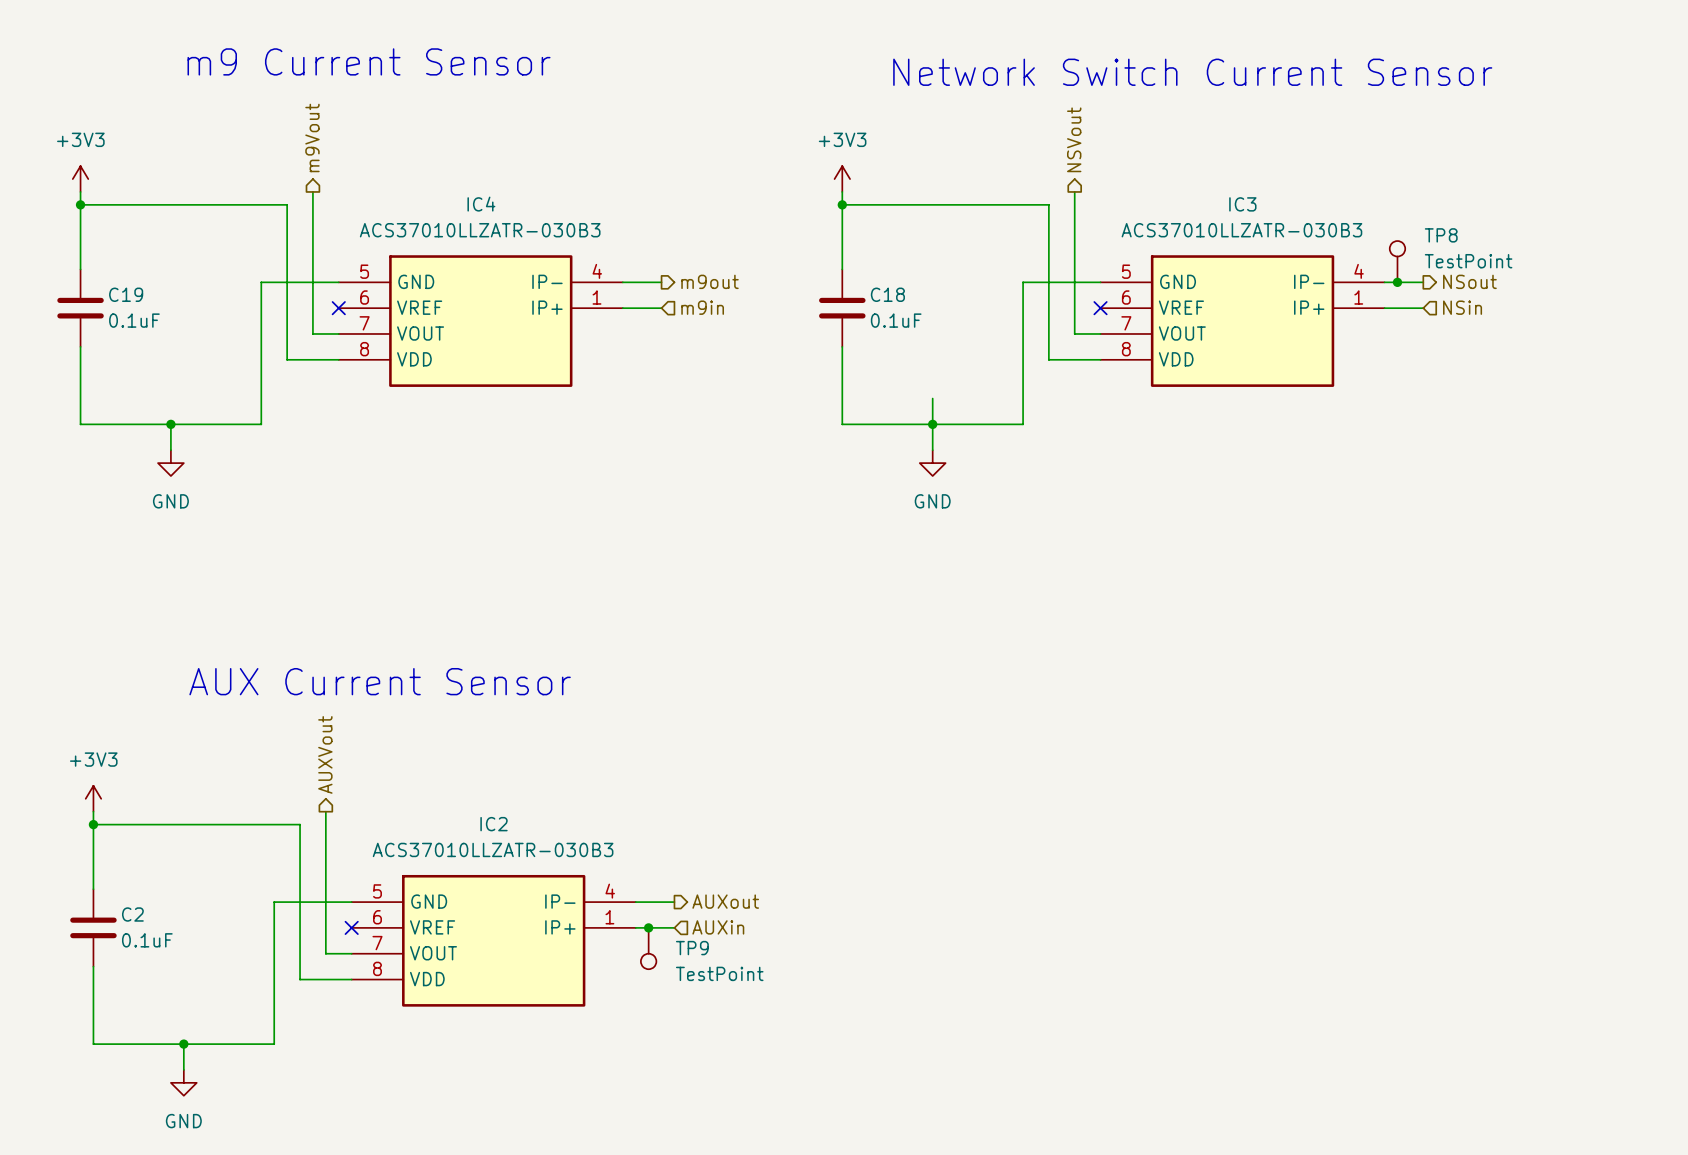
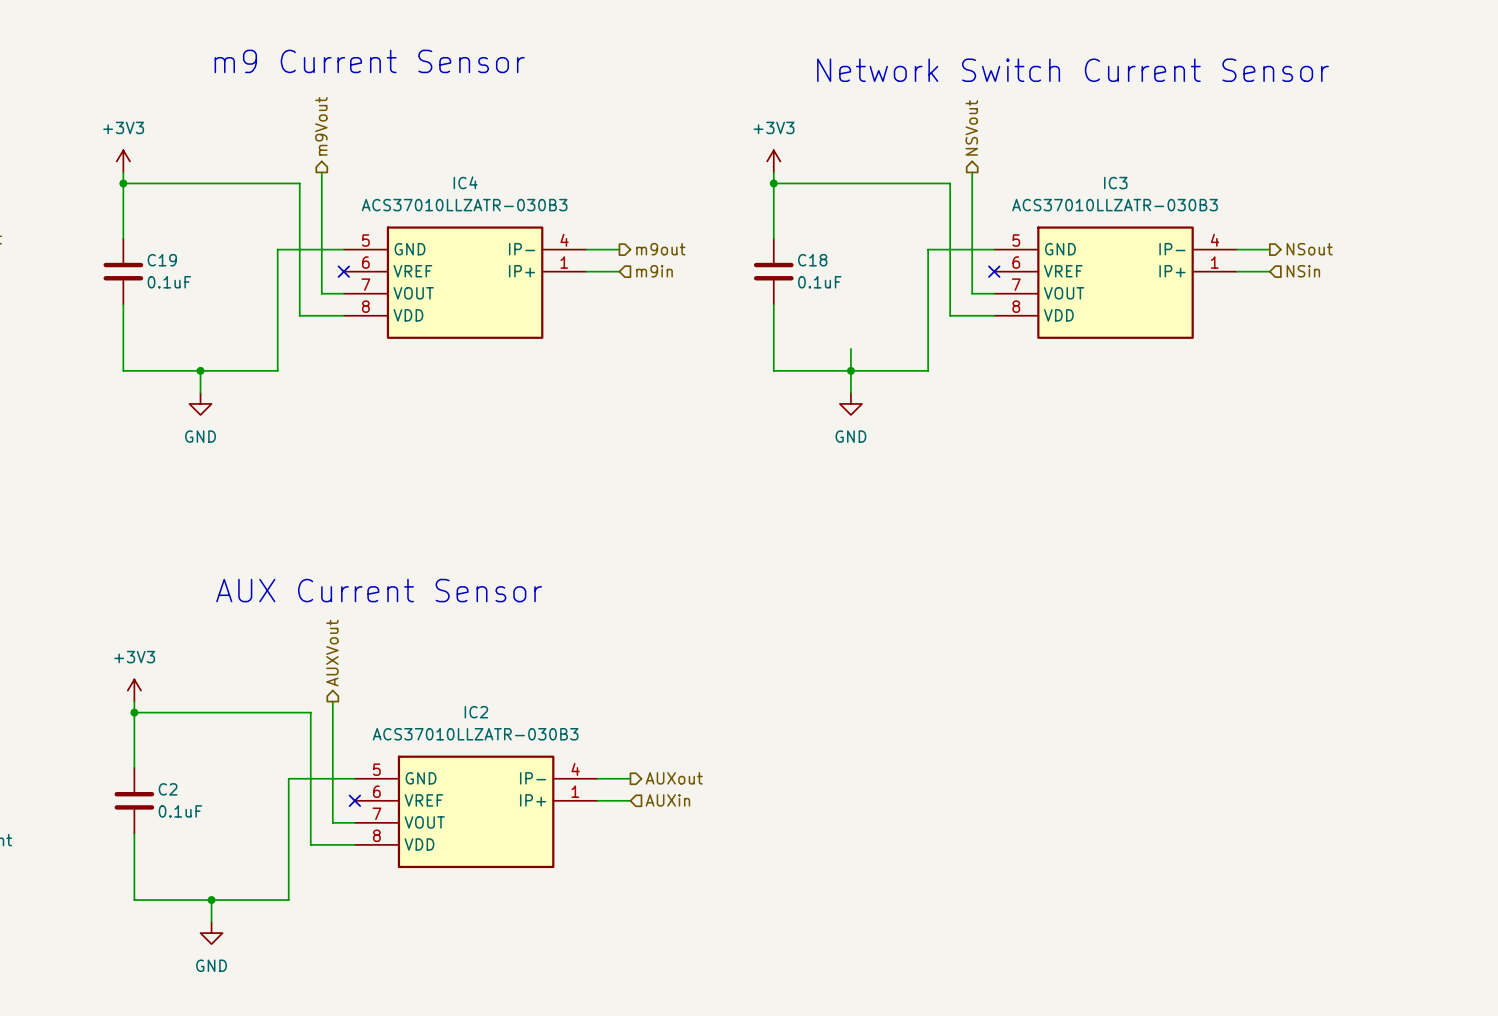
TP8: TestPoint (1397, 261) -> none
junction: (1397, 282) -> none
junction: (648, 927) -> none
TP9: TestPoint (648, 948) -> none

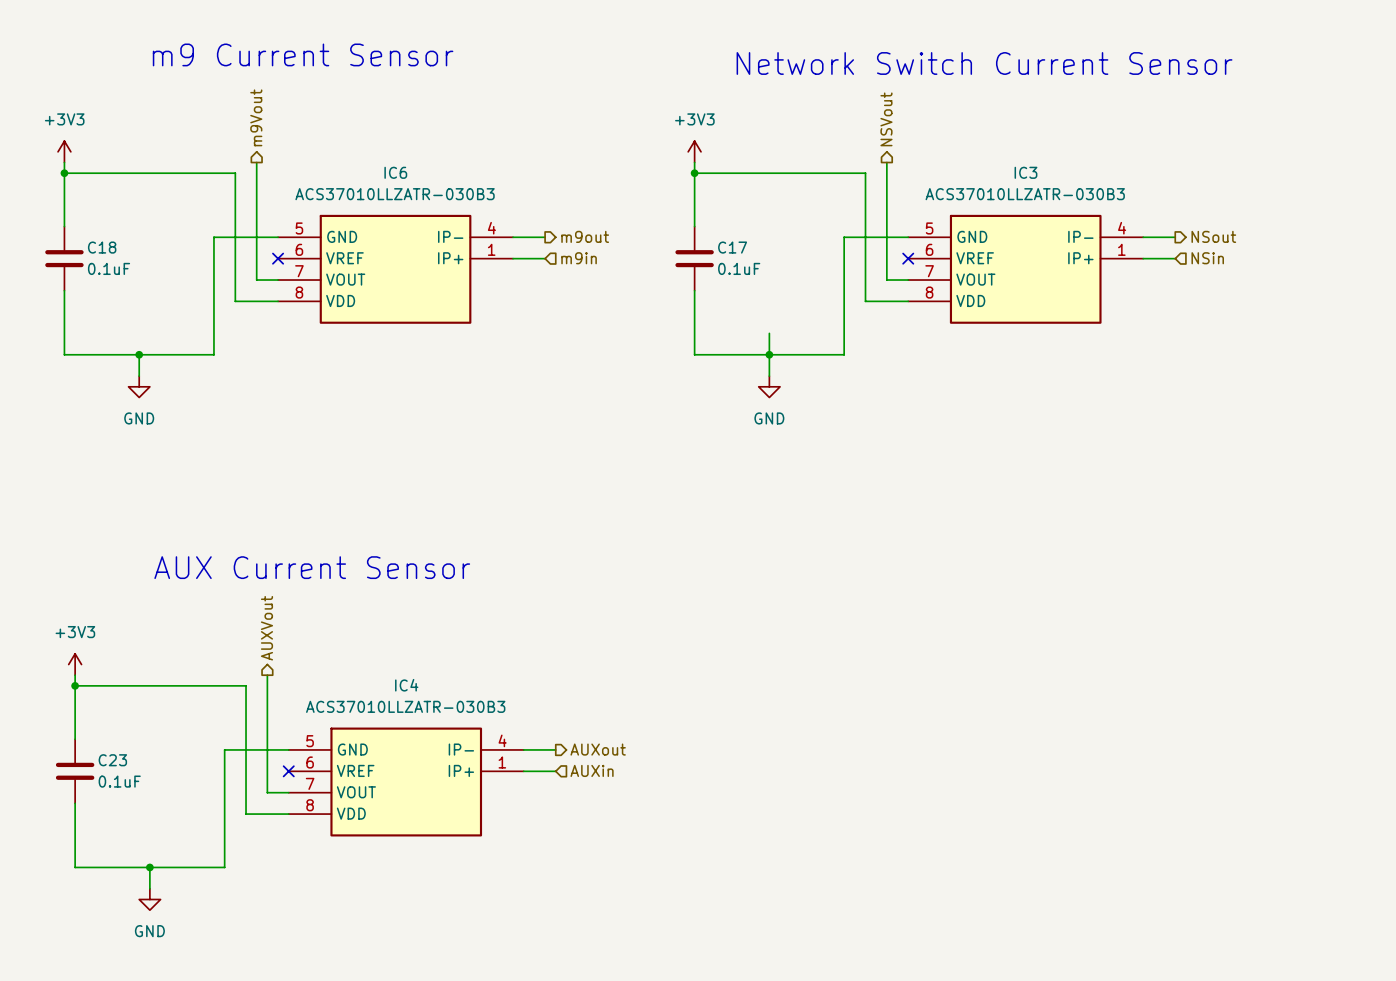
IC4 name: IC4 (465, 182) -> IC6 (395, 172)
C19 name: C19 (162, 260) -> C18 (102, 247)
C18 name: C18 (812, 260) -> C17 (732, 247)
IC2 name: IC2 (476, 712) -> IC4 (406, 685)
C2 name: C2 (168, 789) -> C23 (112, 760)

